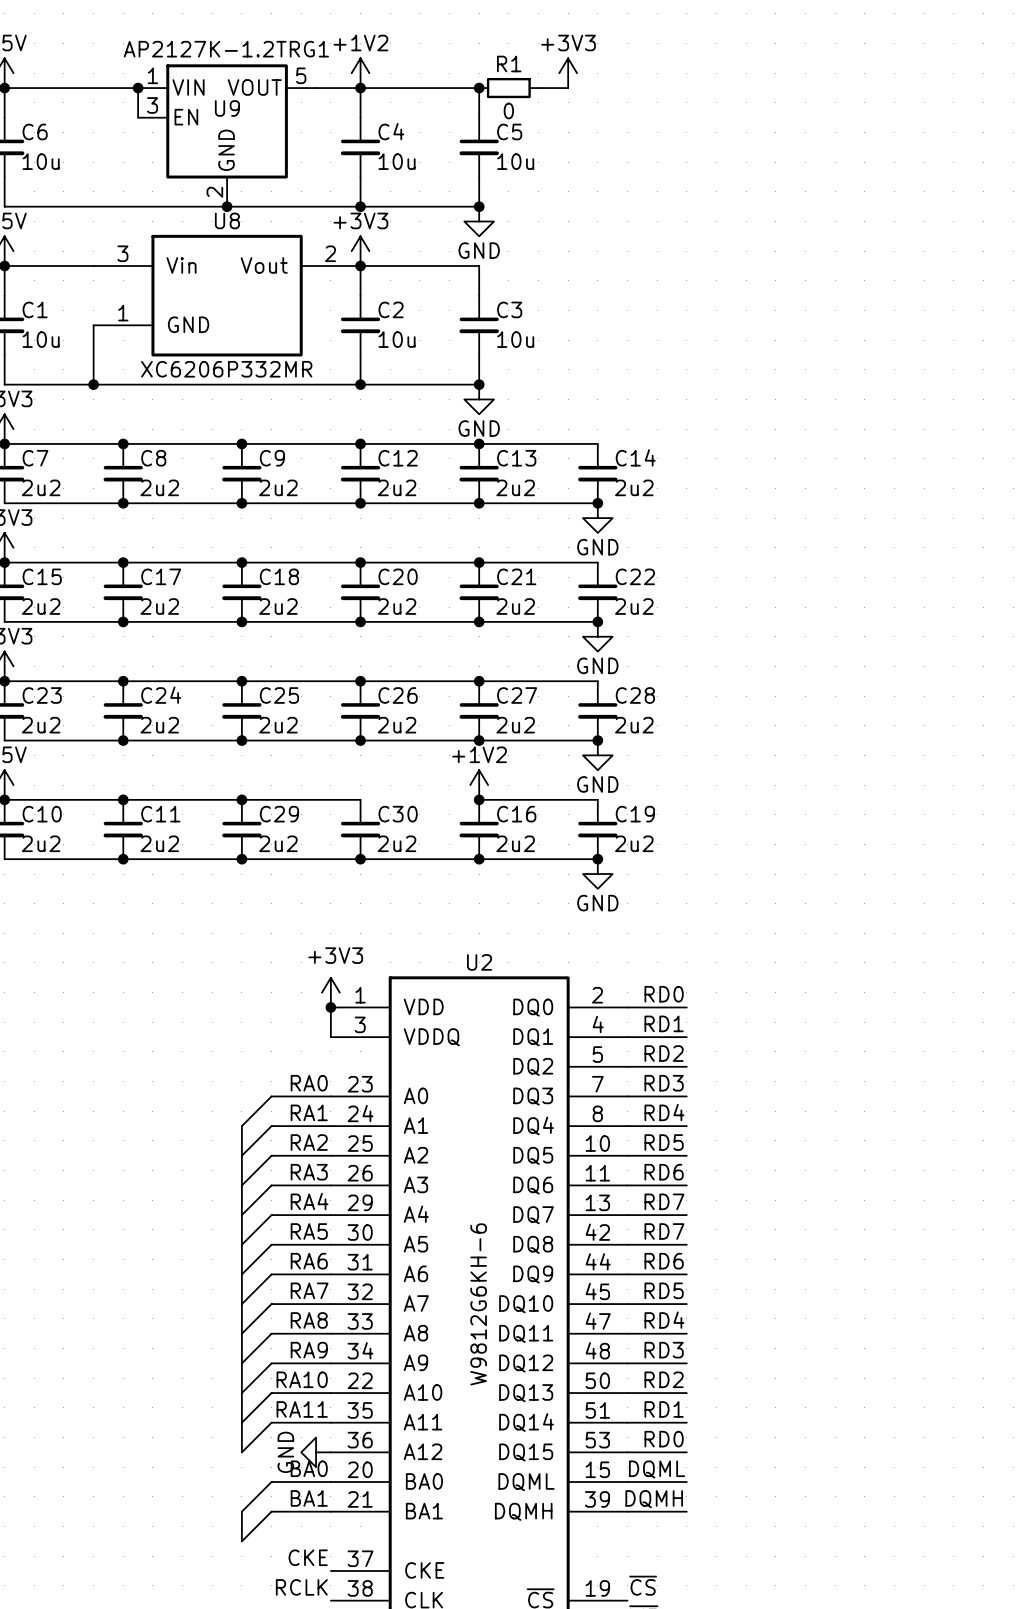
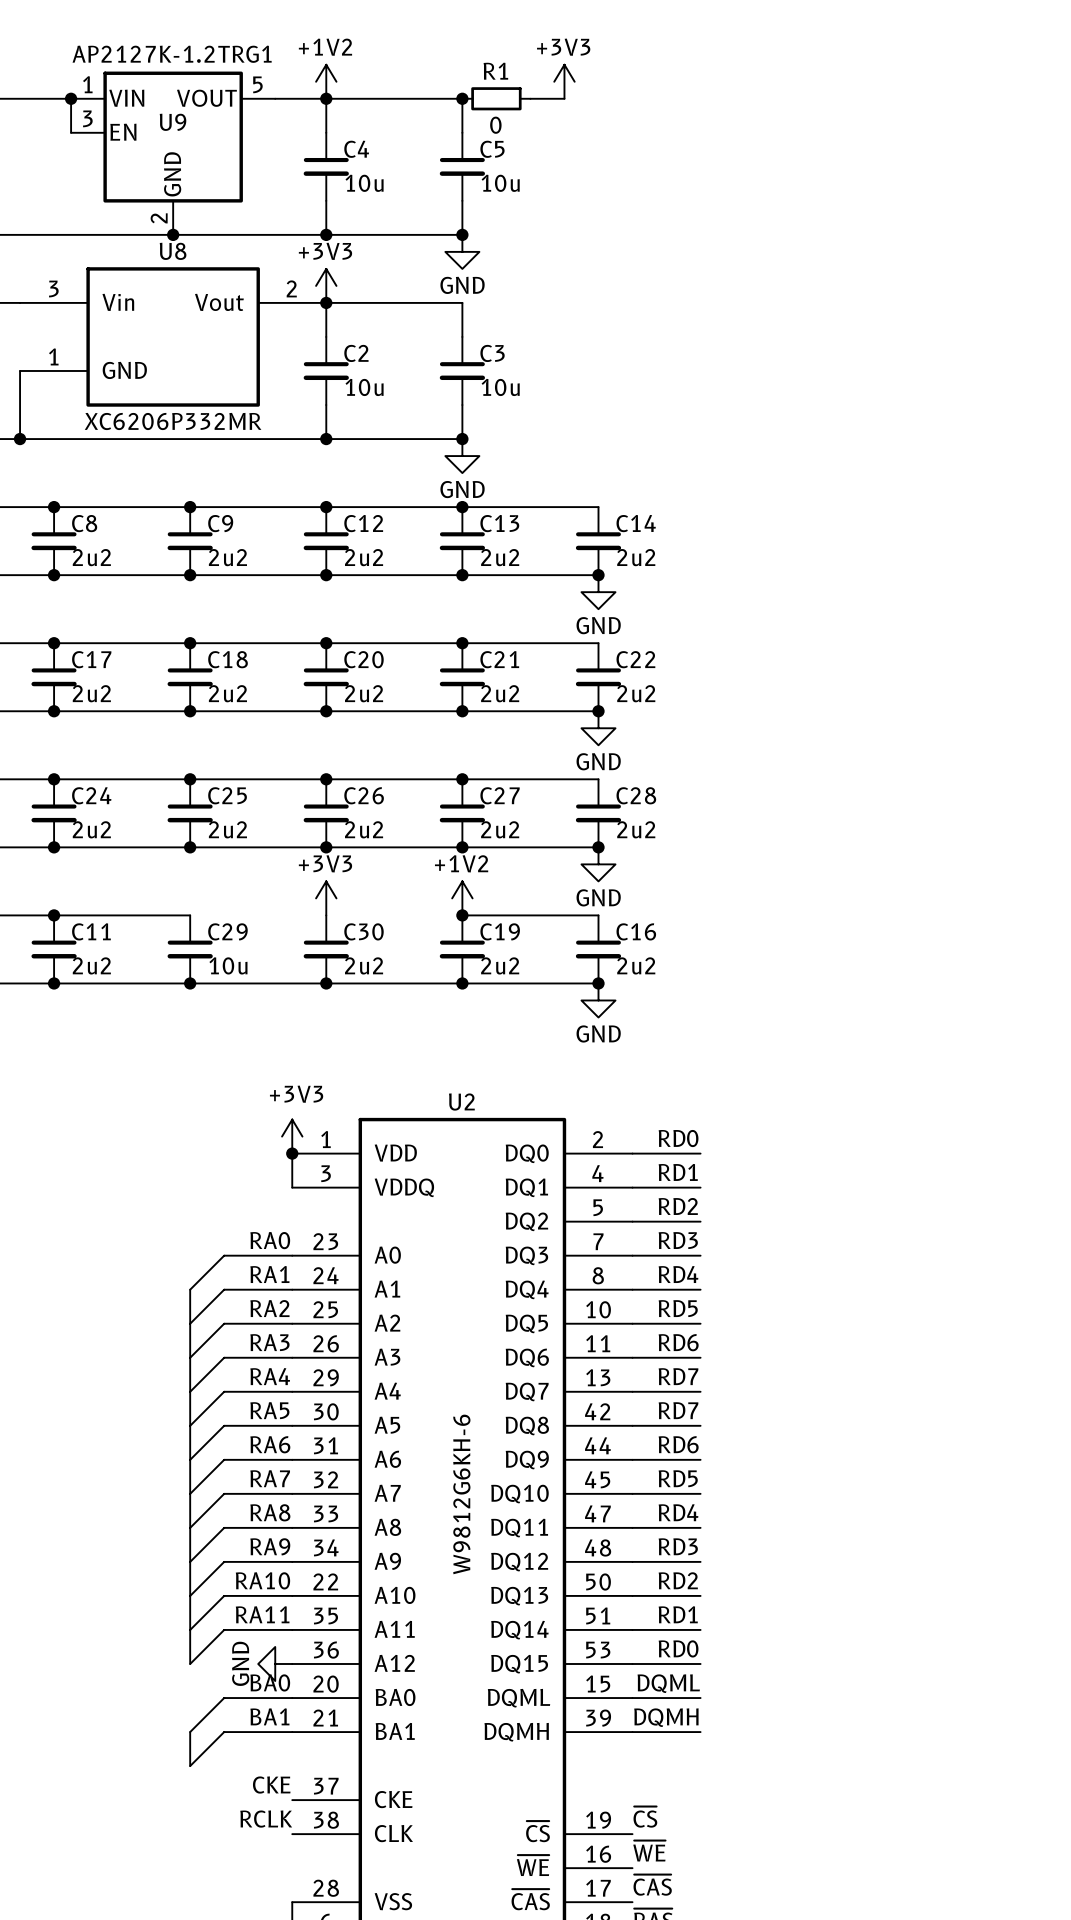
power symbol: none -> +3V3 (326, 898)
wire: (241, 799) (360, 799) -> none
junction: (241, 799) -> none
C16 name: C16 (516, 814) -> C19 (500, 931)
C19 name: C19 (635, 814) -> C16 (636, 931)
C29 value: 2u2 (278, 843) -> 10u (228, 965)

